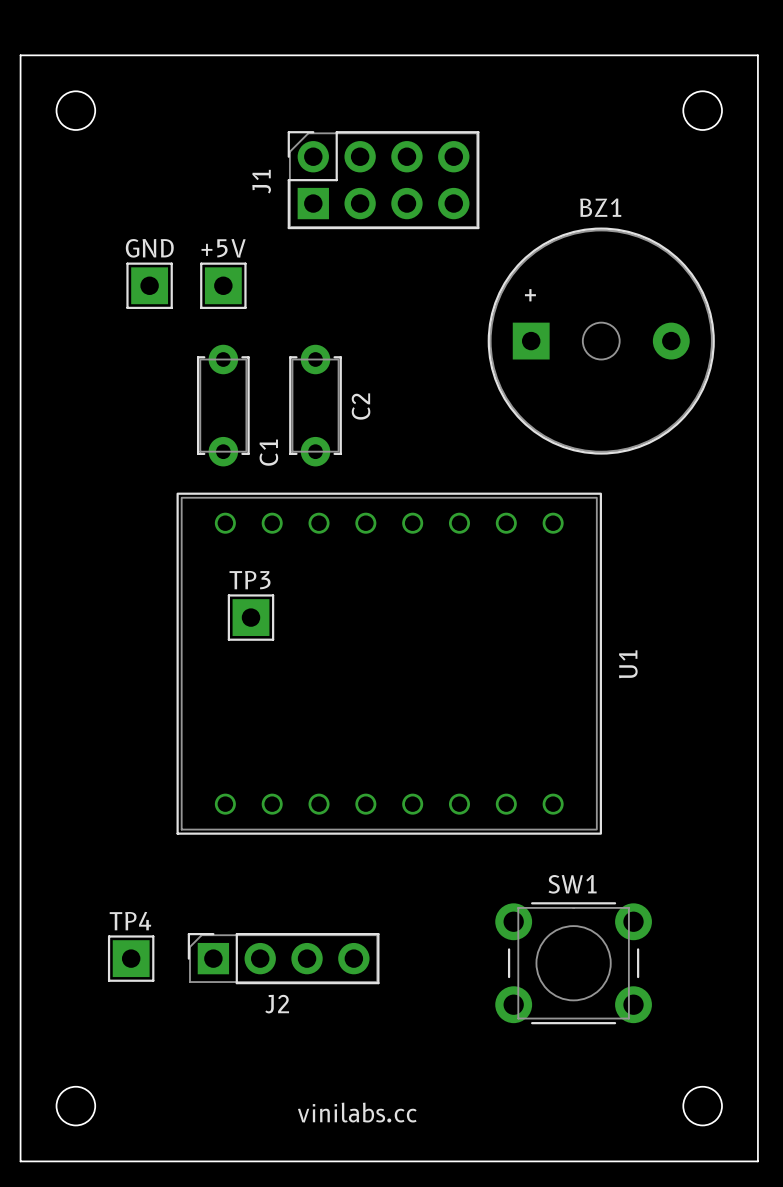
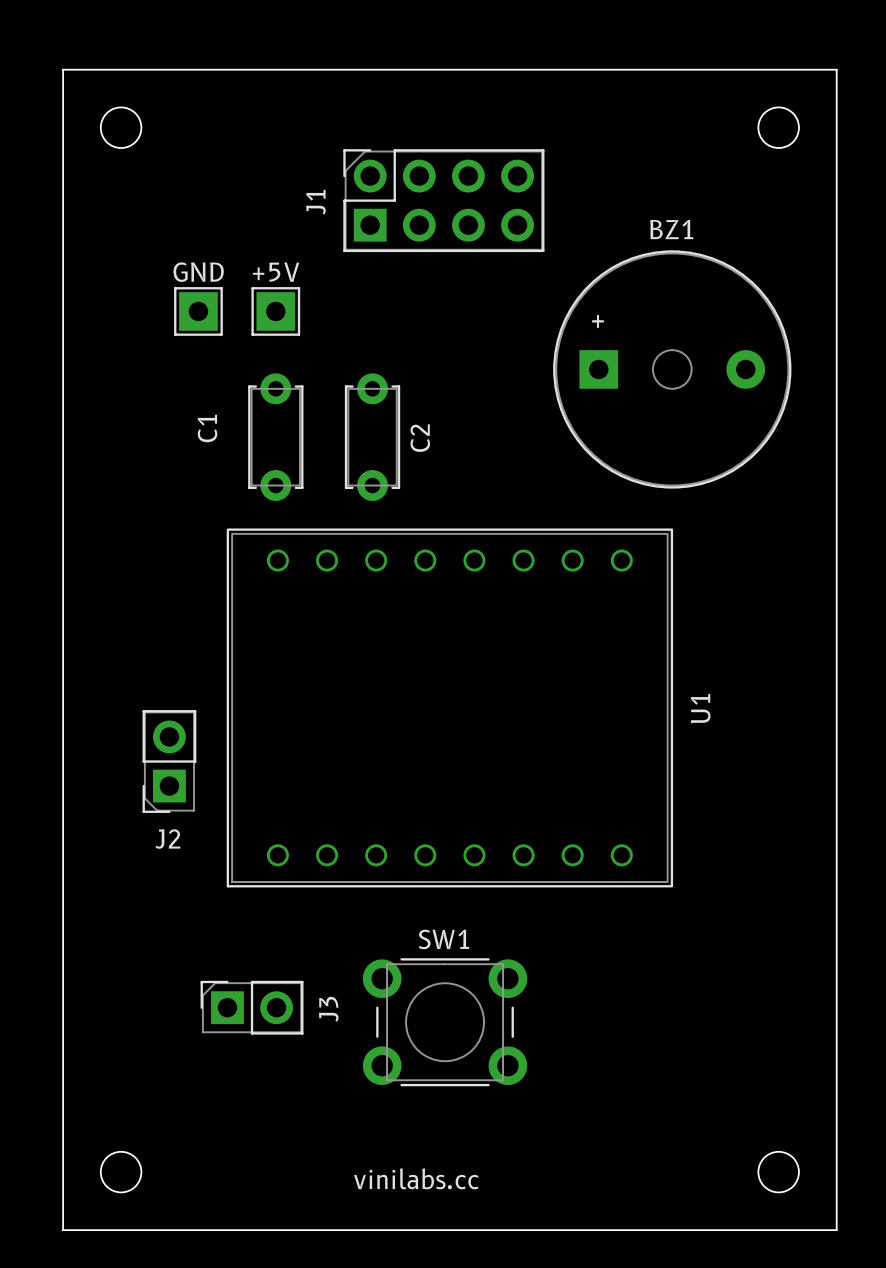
C1 name position: C1 (268, 452) -> C1 (207, 428)
TP3: (251, 617) -> none
J2 footprint: [187, 933, 380, 985] -> [142, 710, 197, 813]
J3: none -> (252, 1007)
TP4: (131, 958) -> none
SW1 position: (573, 963) -> (445, 1022)

